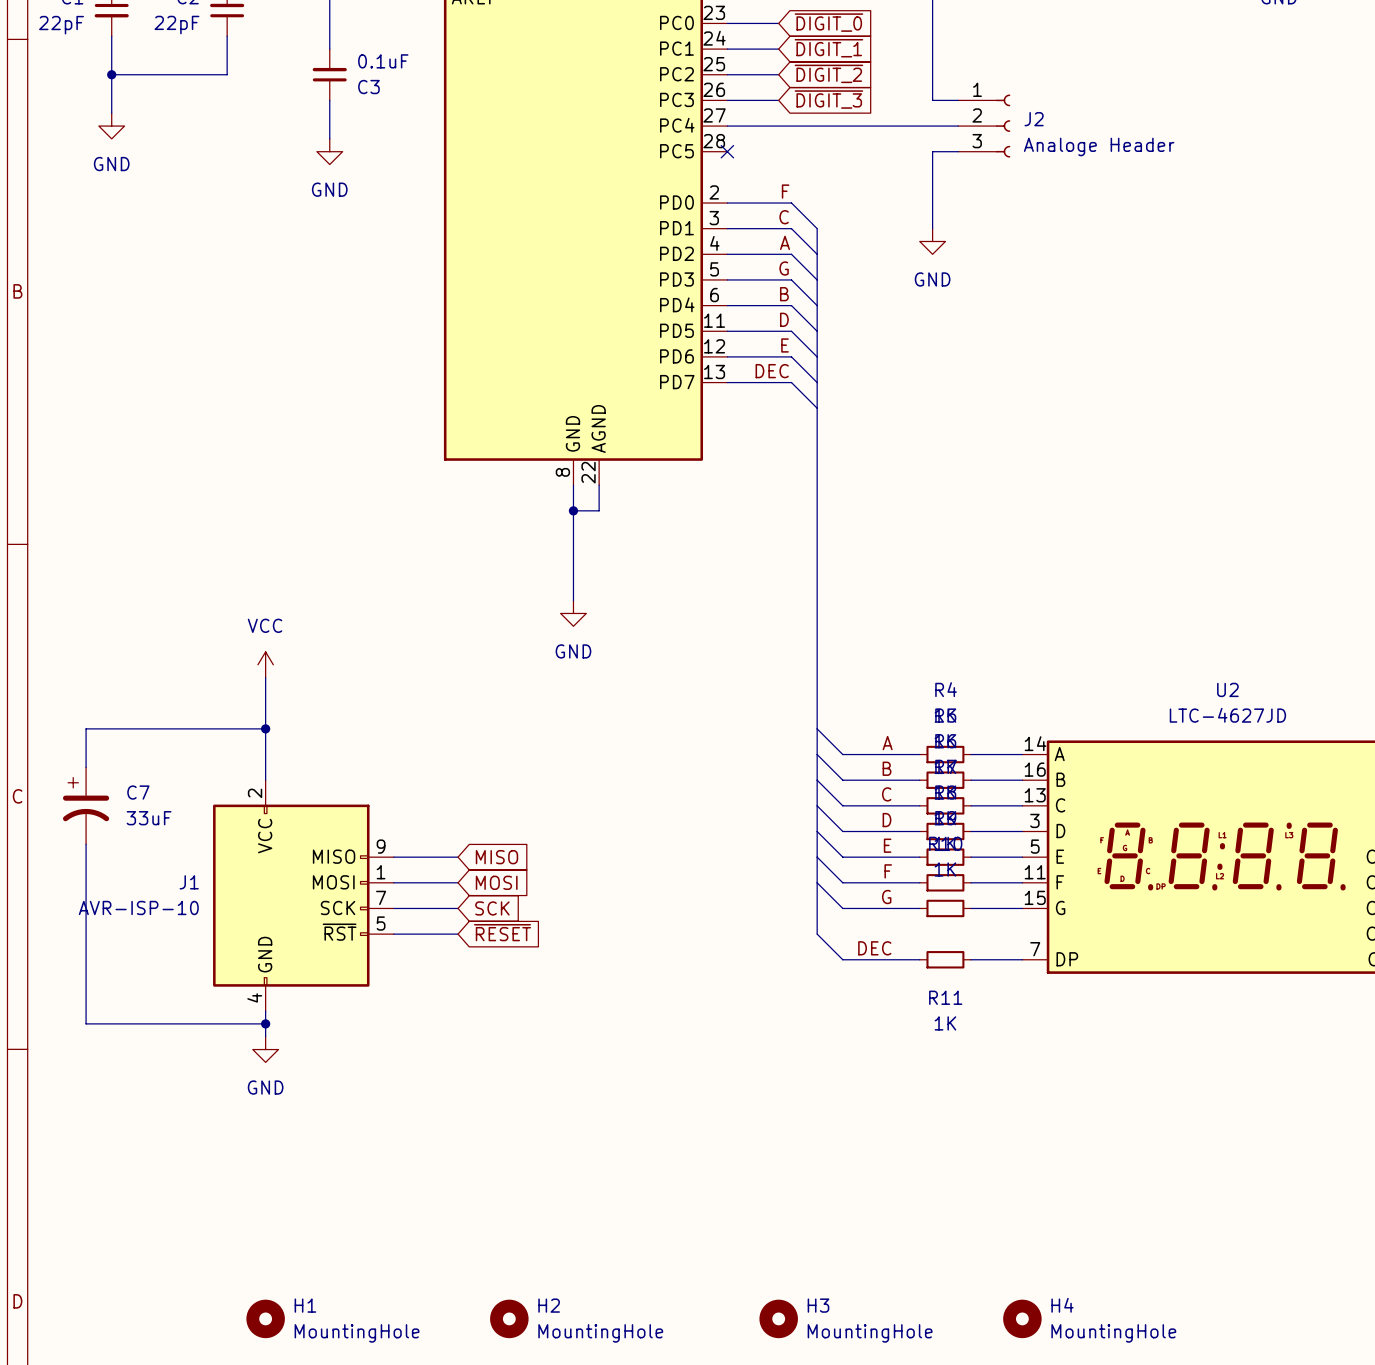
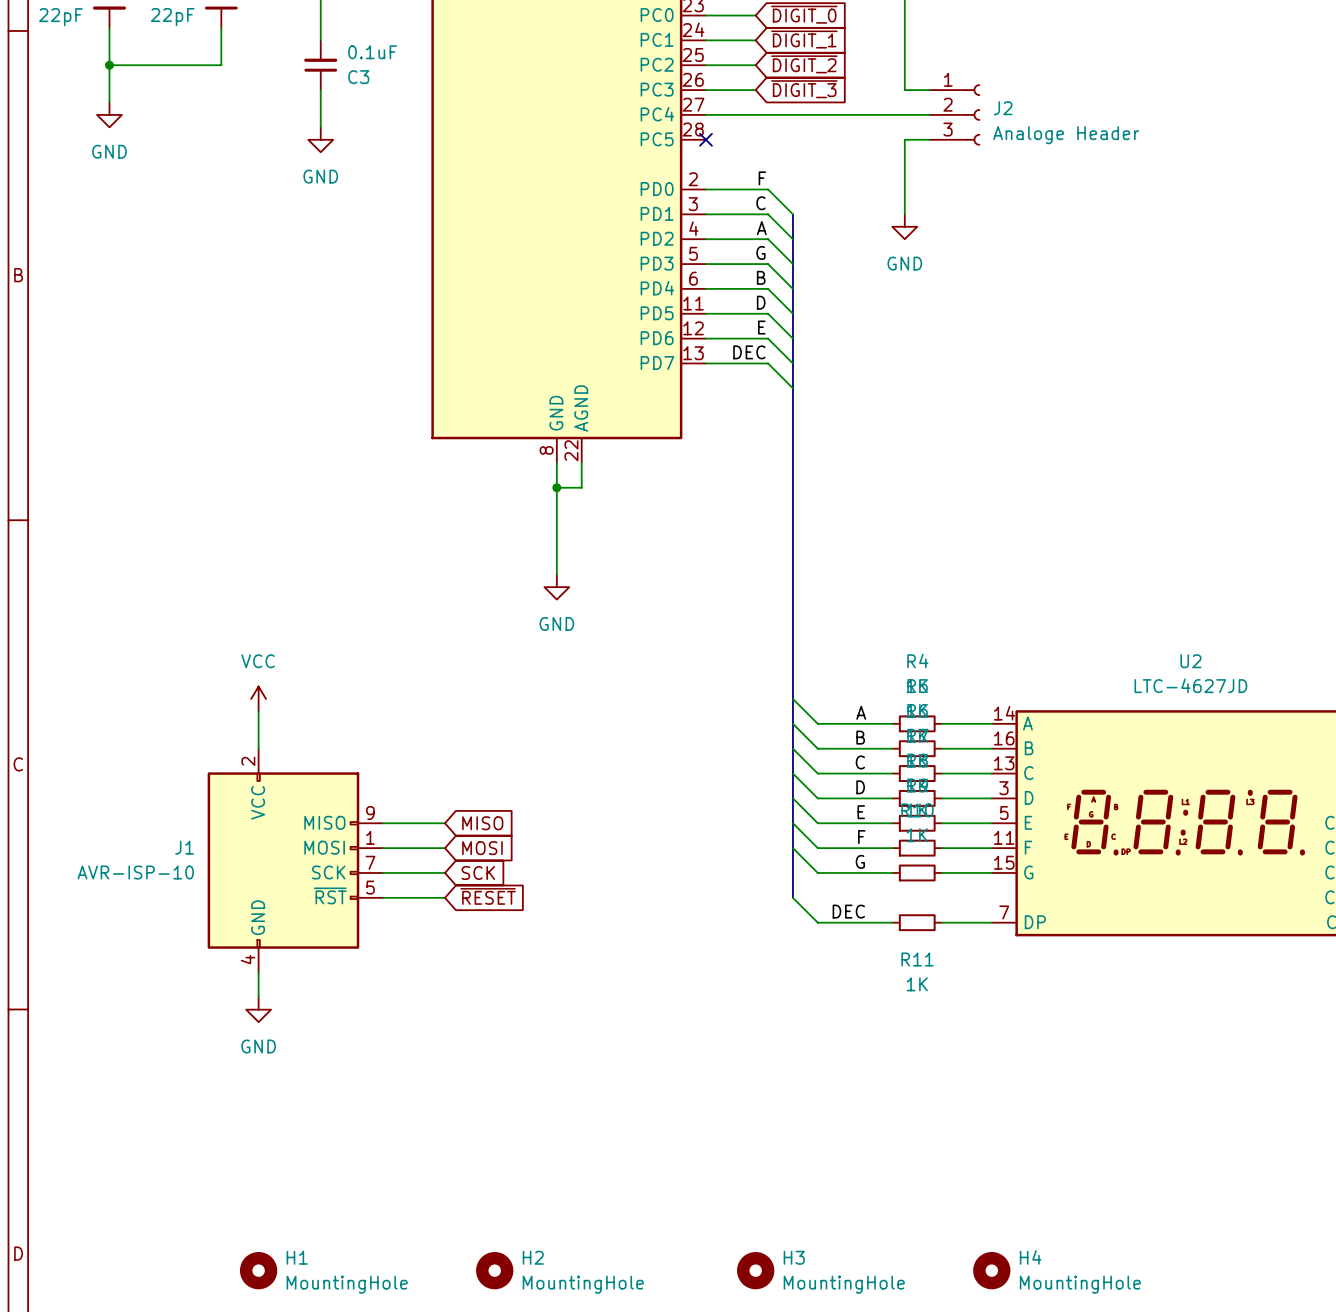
power symbol position: VCC (265, 664) -> VCC (258, 699)
wire: (265, 677) (265, 741) -> none
wire: (265, 728) (86, 728) (86, 767) -> none
junction: (265, 728) -> none
C7: 33uF (86, 805) -> none
wire: (86, 844) (86, 1023) (265, 1023) -> none
junction: (265, 1023) -> none

